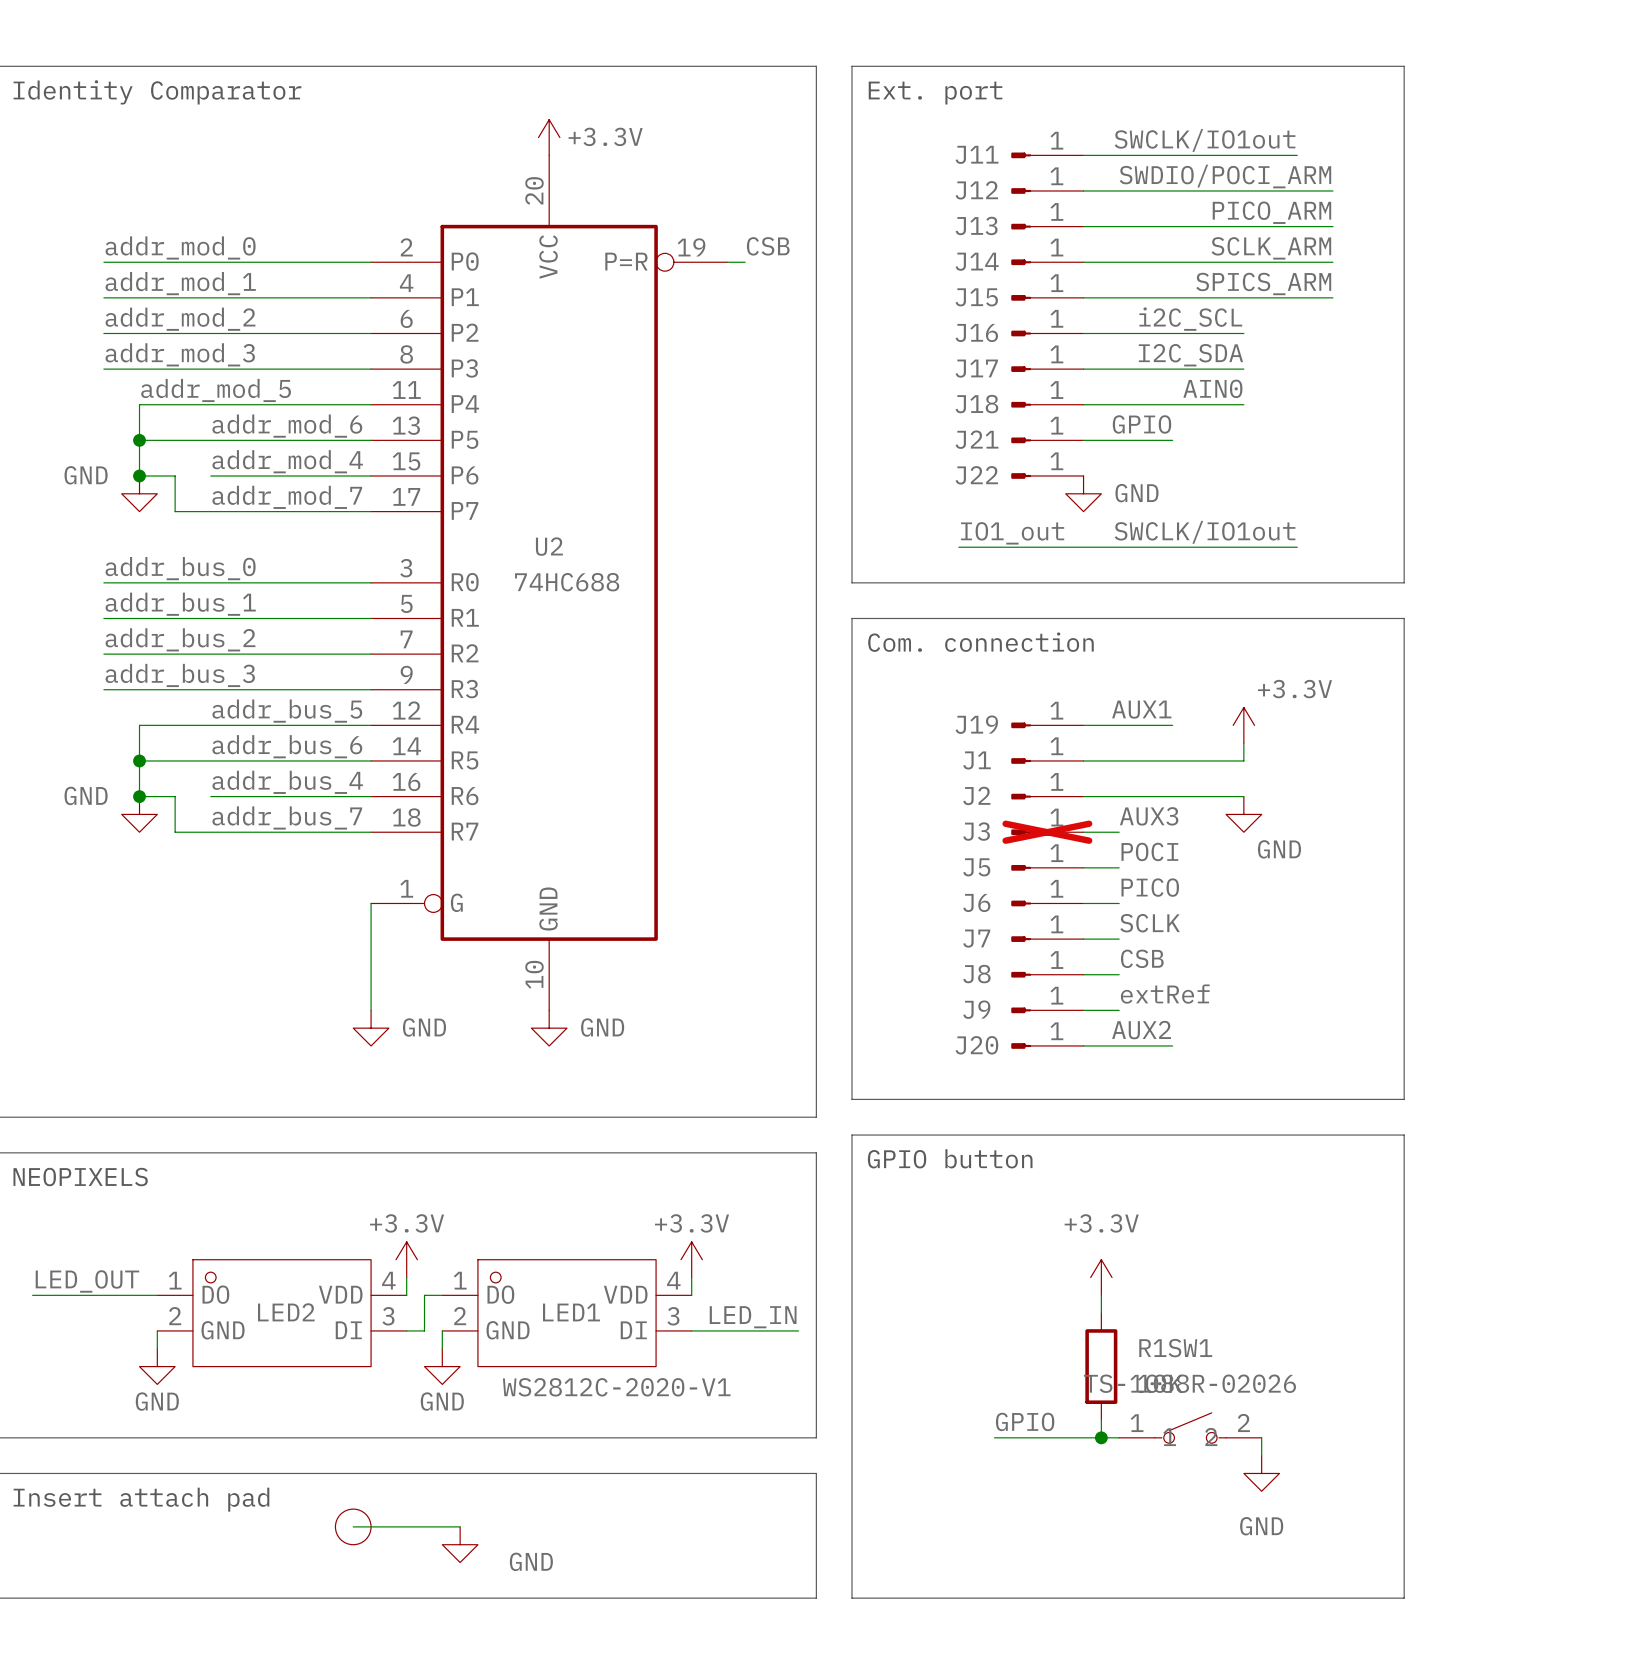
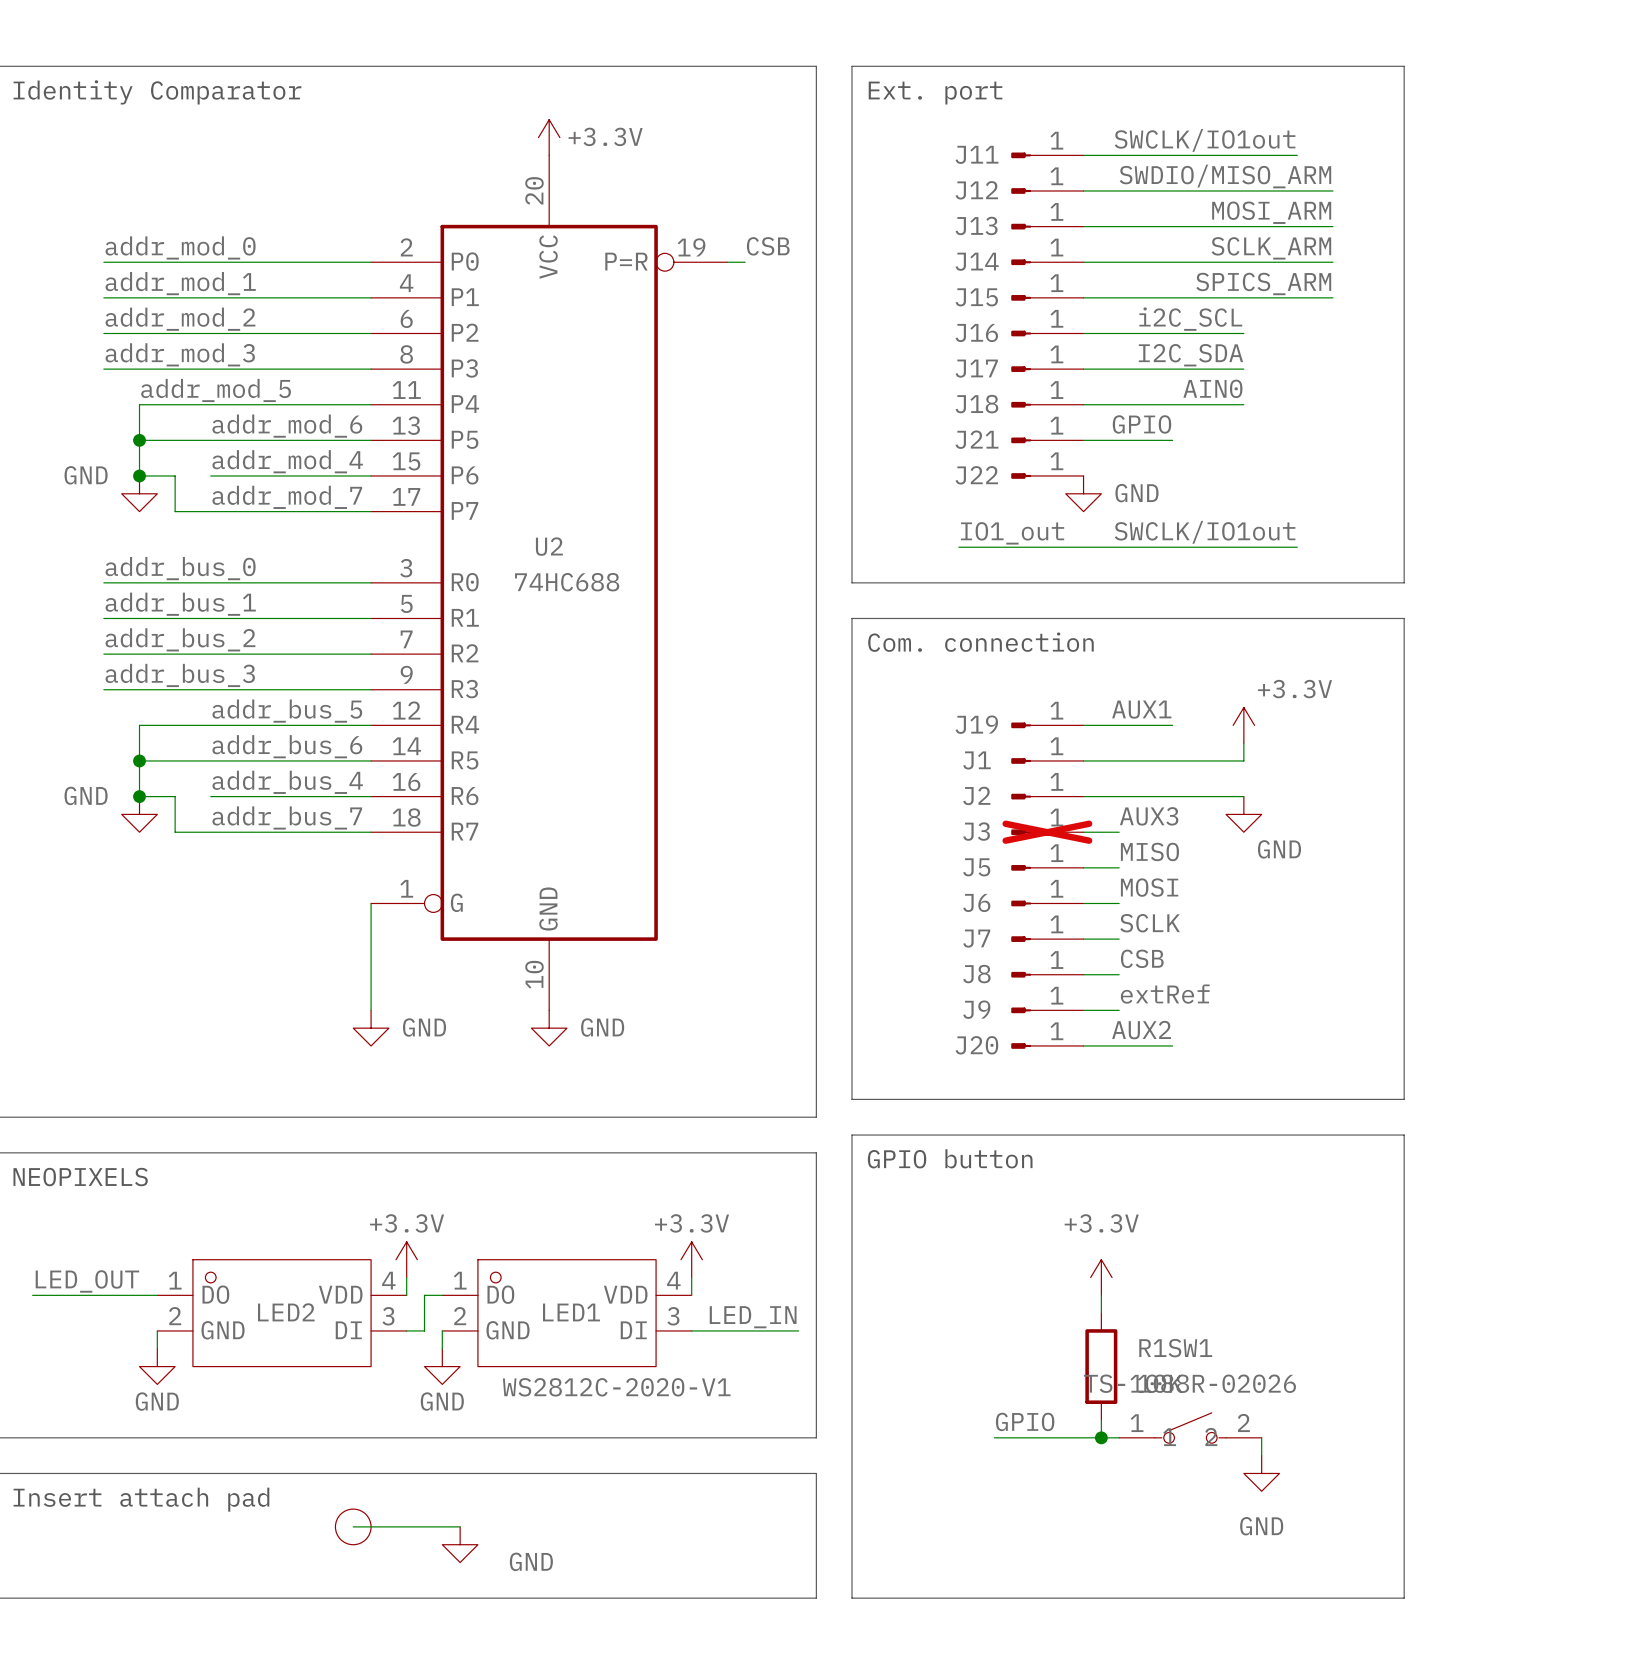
label: SWDIO/POCI_ARM (1225, 176) -> SWDIO/MISO_ARM (1225, 176)
label: PICO_ARM (1271, 212) -> MOSI_ARM (1271, 212)
label: POCI (1149, 851) -> MISO (1149, 851)
label: PICO (1150, 887) -> MOSI (1149, 887)

